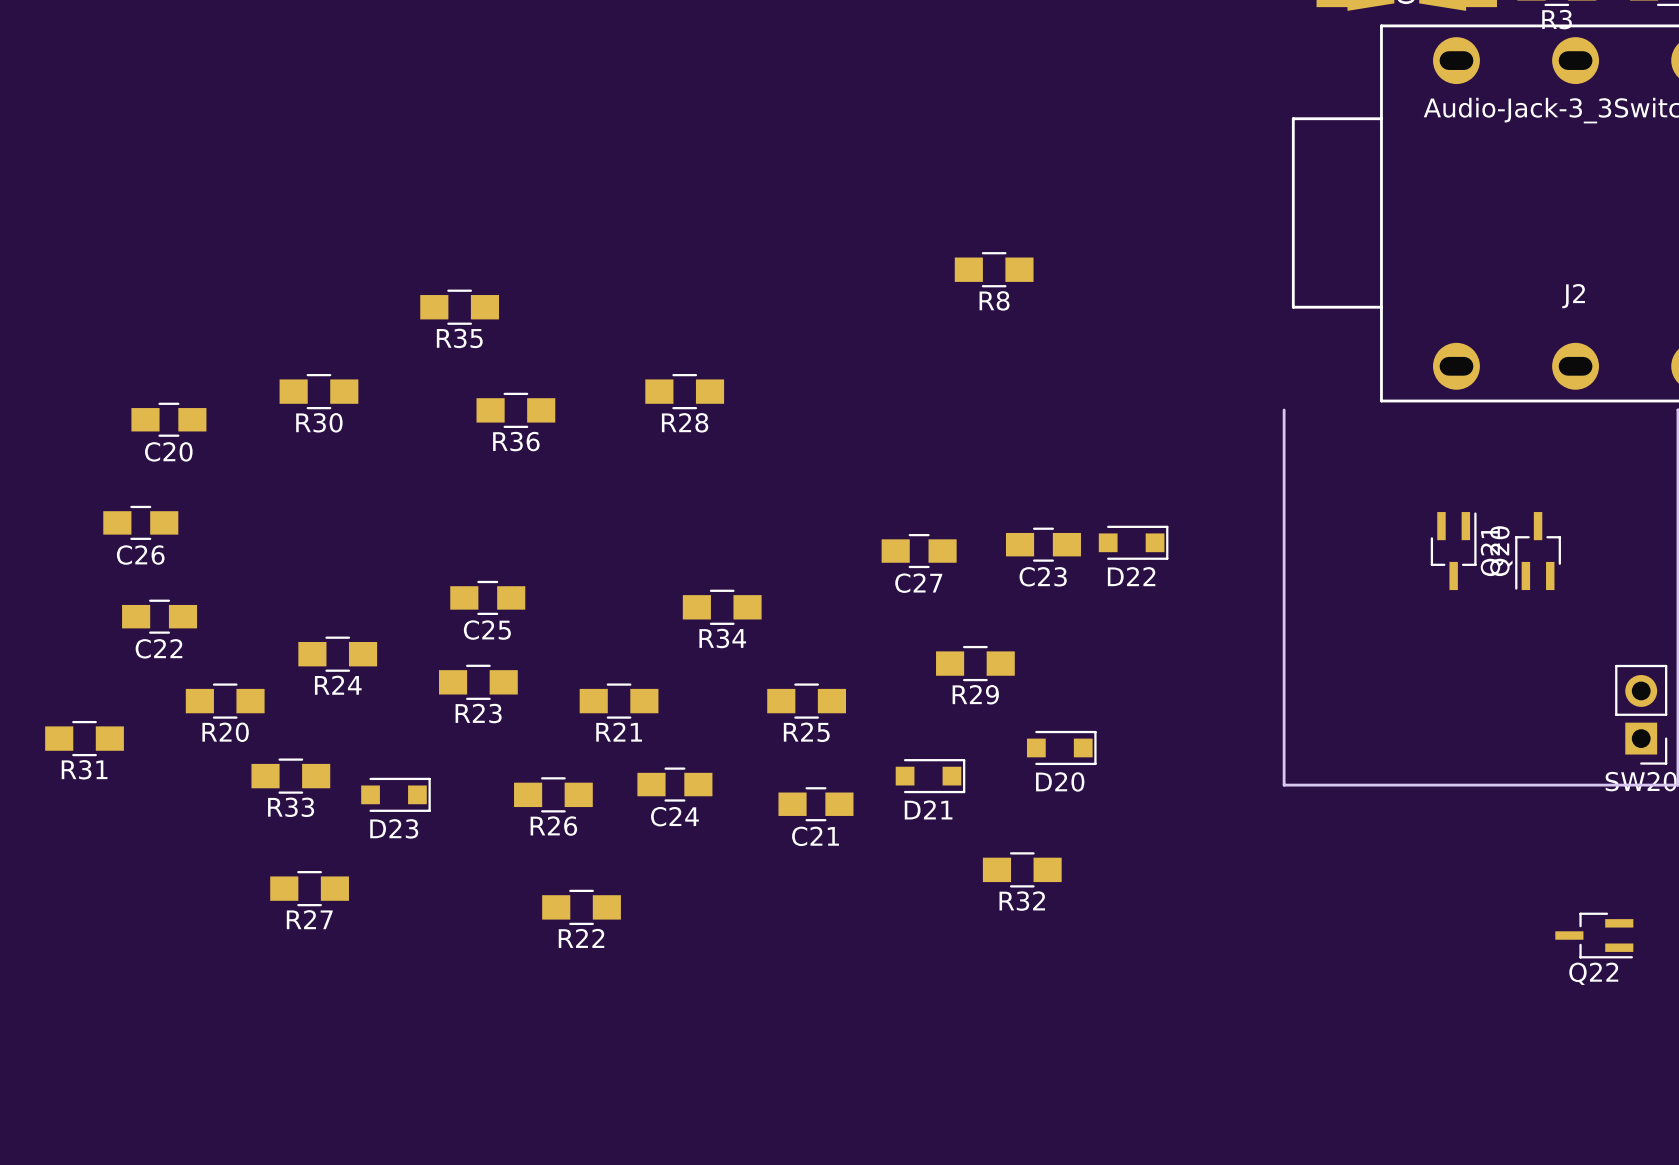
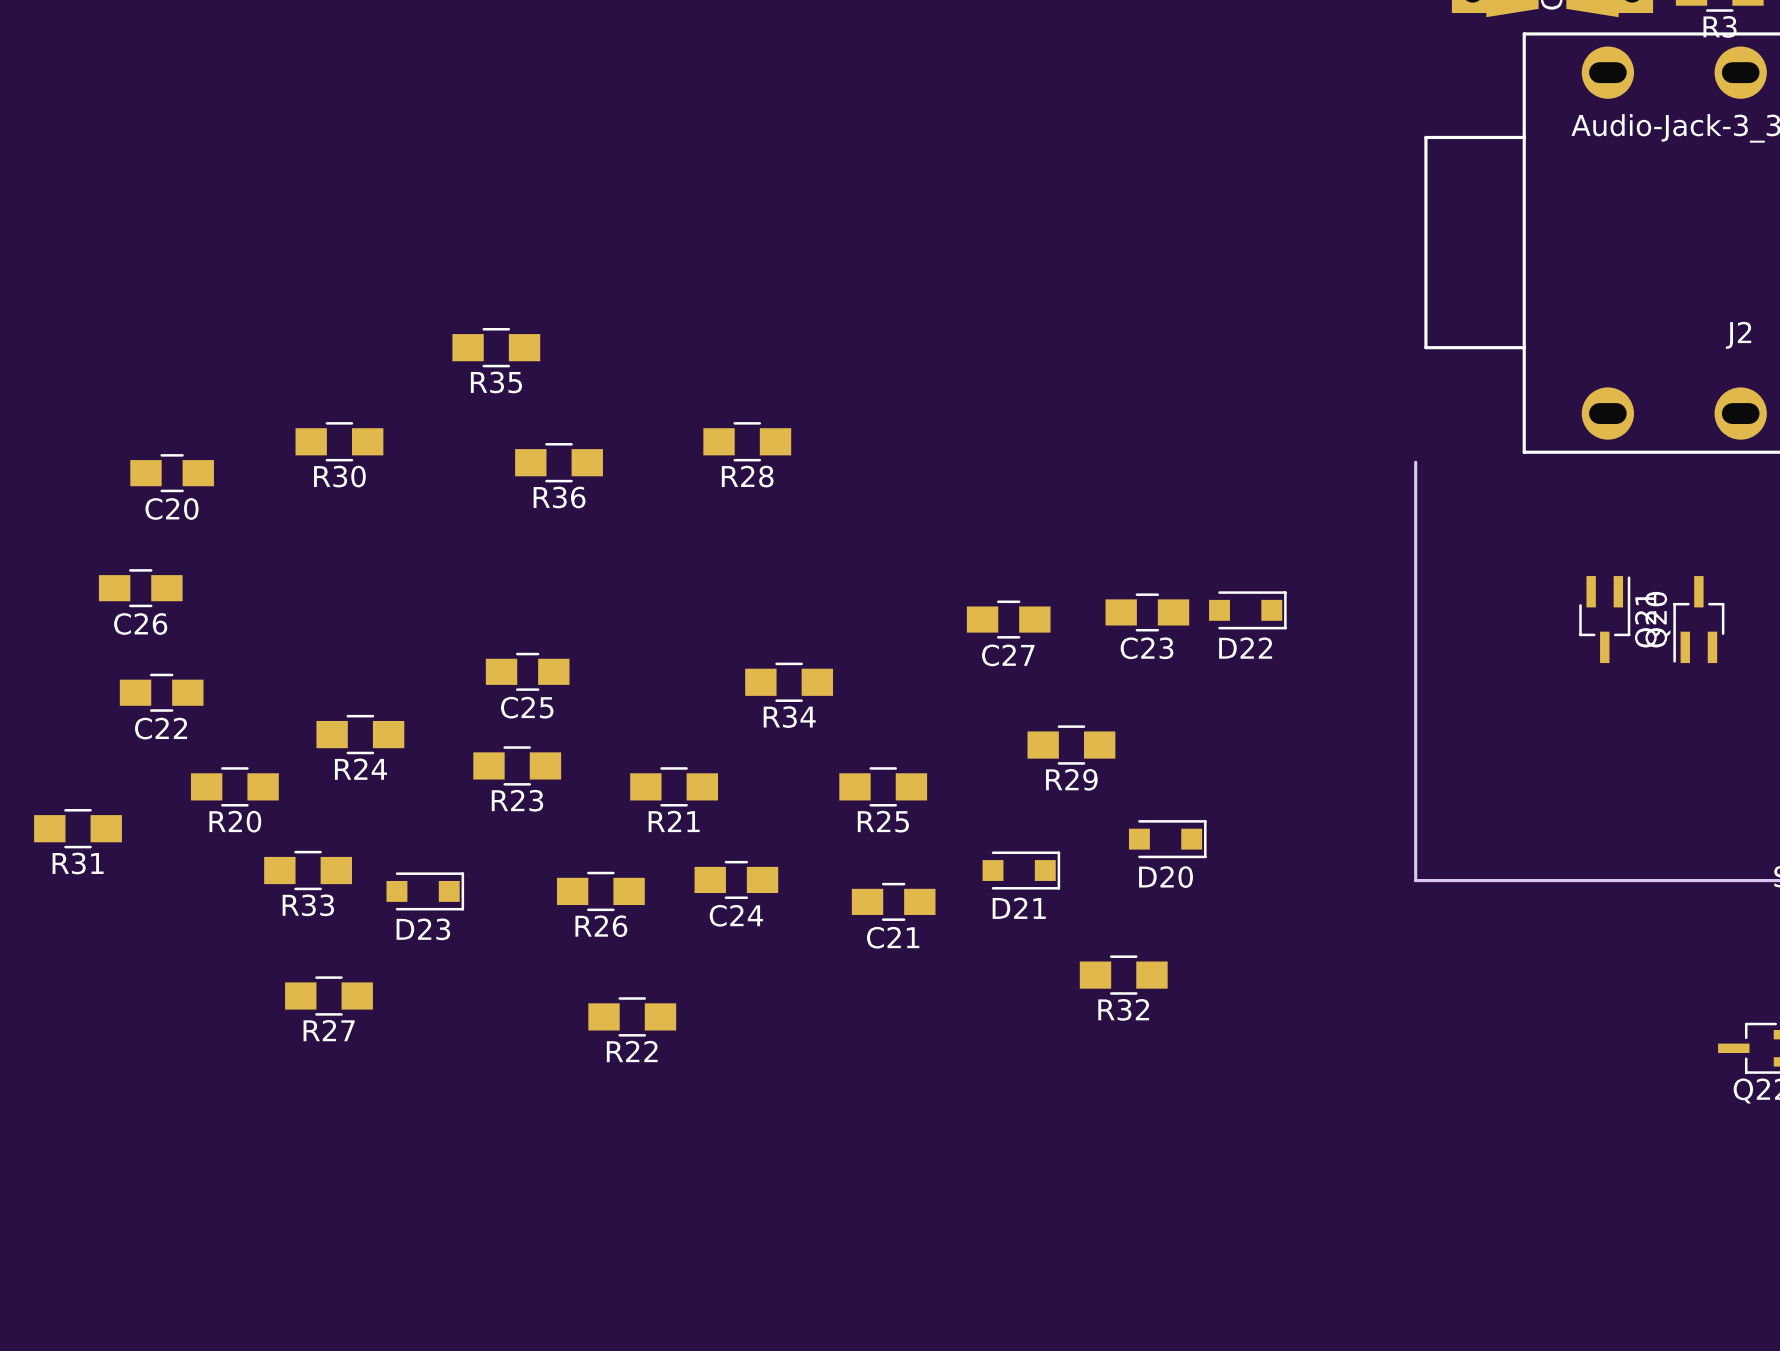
R8: (994, 269) -> none

